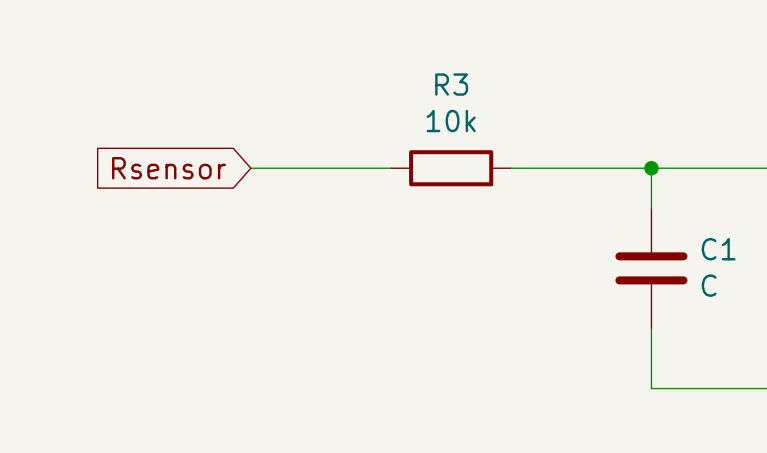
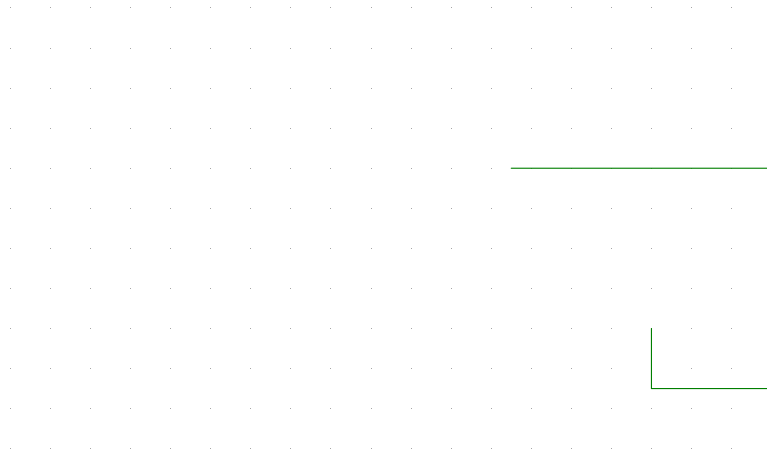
global label: Rsensor (169, 168) -> none
wire: (250, 168) (391, 168) -> none
R3: 10k (451, 168) -> none
wire: (651, 168) (651, 208) -> none
junction: (651, 168) -> none
C1: C (651, 268) -> none

